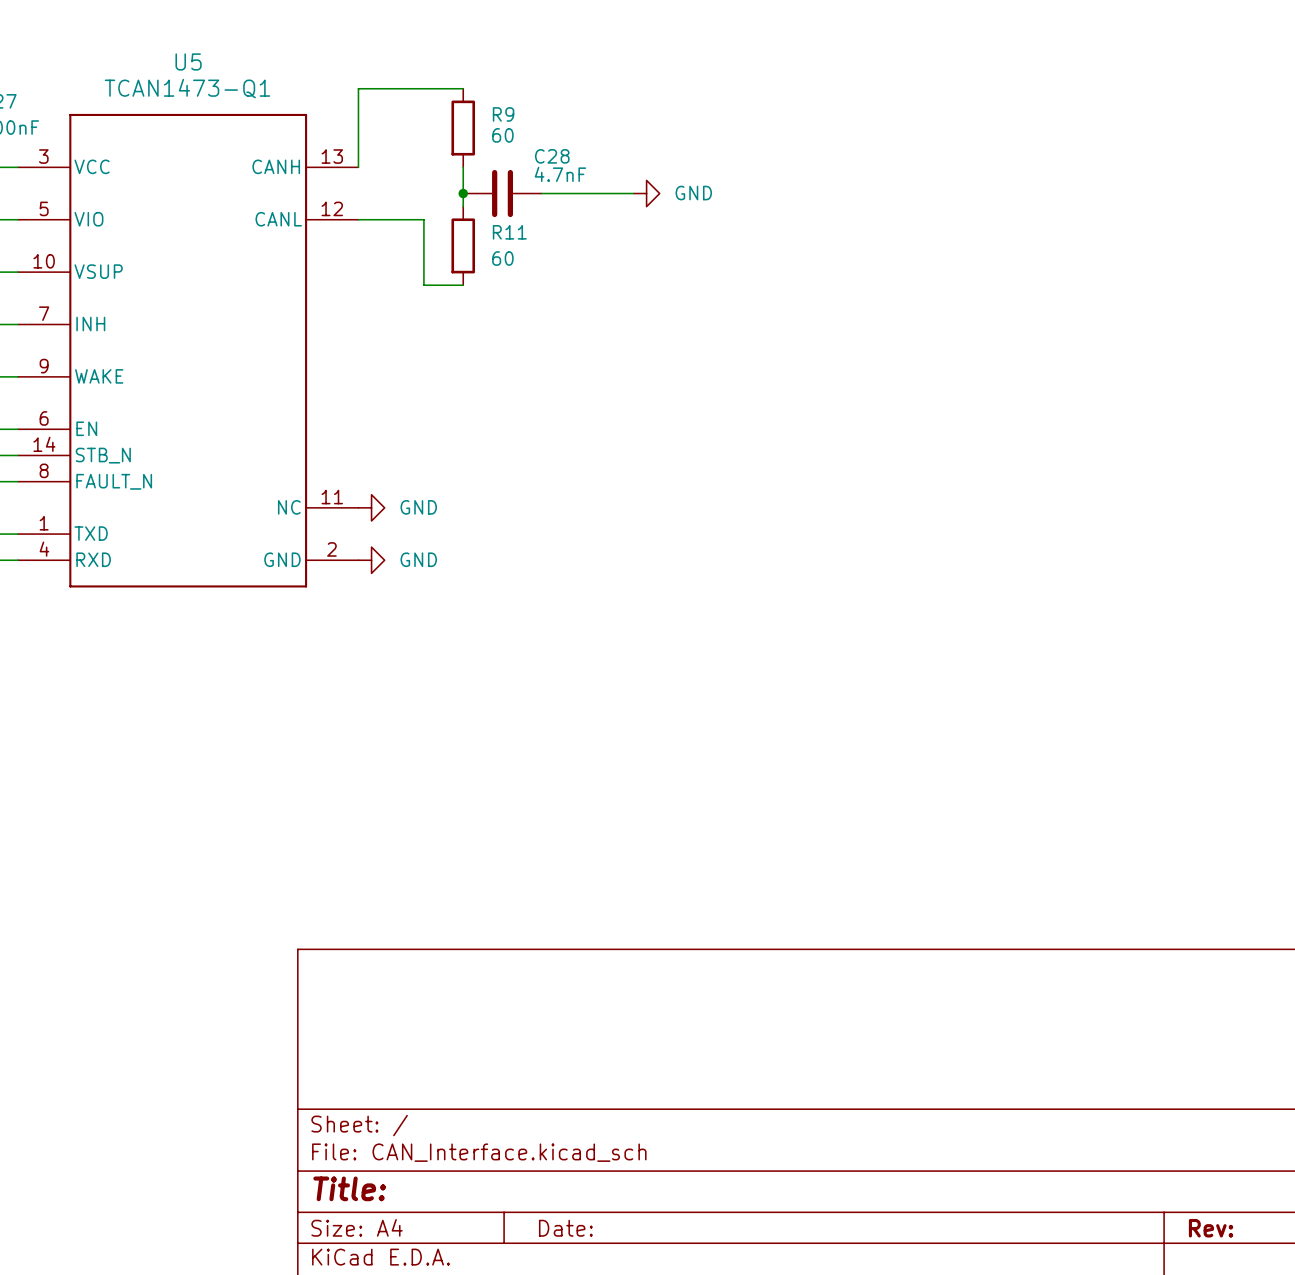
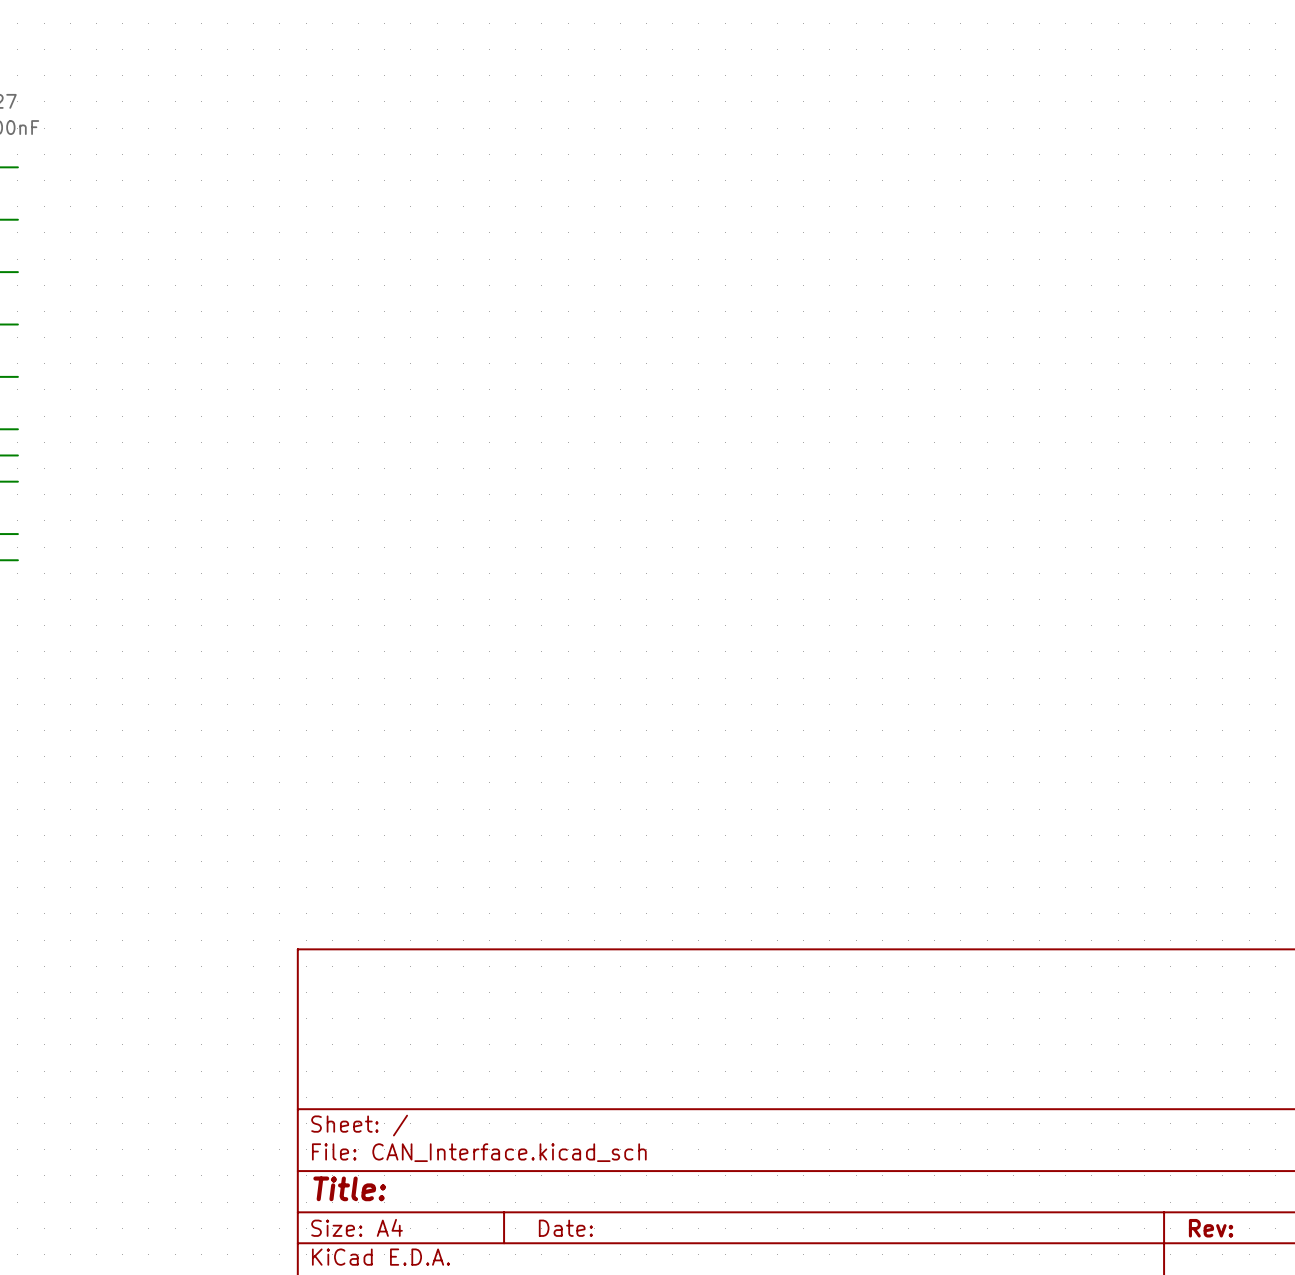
wire: (463, 88) (358, 88) (358, 167) -> none
R9: 60 (463, 128) -> none
wire: (463, 167) (463, 206) -> none
junction: (463, 193) -> none
C28: 4.7nF (502, 193) -> none
wire: (541, 193) (633, 193) -> none
power symbol: GND (646, 193) -> none
wire: (358, 219) (423, 219) (423, 285) (463, 285) -> none
R11: 60 (463, 245) -> none
U5: TCAN1473-Q1 (188, 350) -> none
power symbol: GND (371, 507) -> none
power symbol: GND (371, 560) -> none

